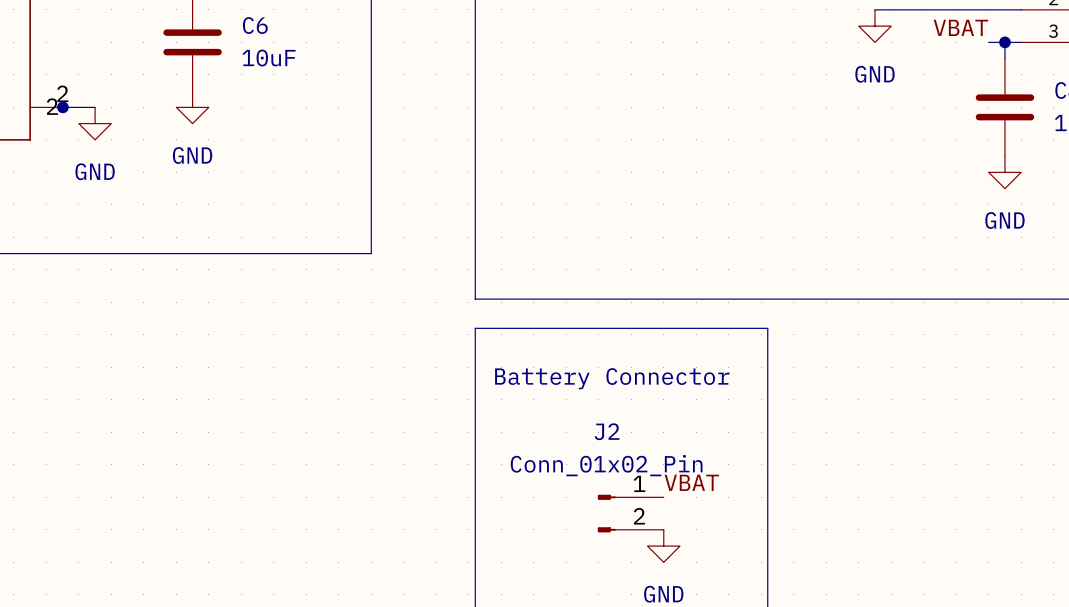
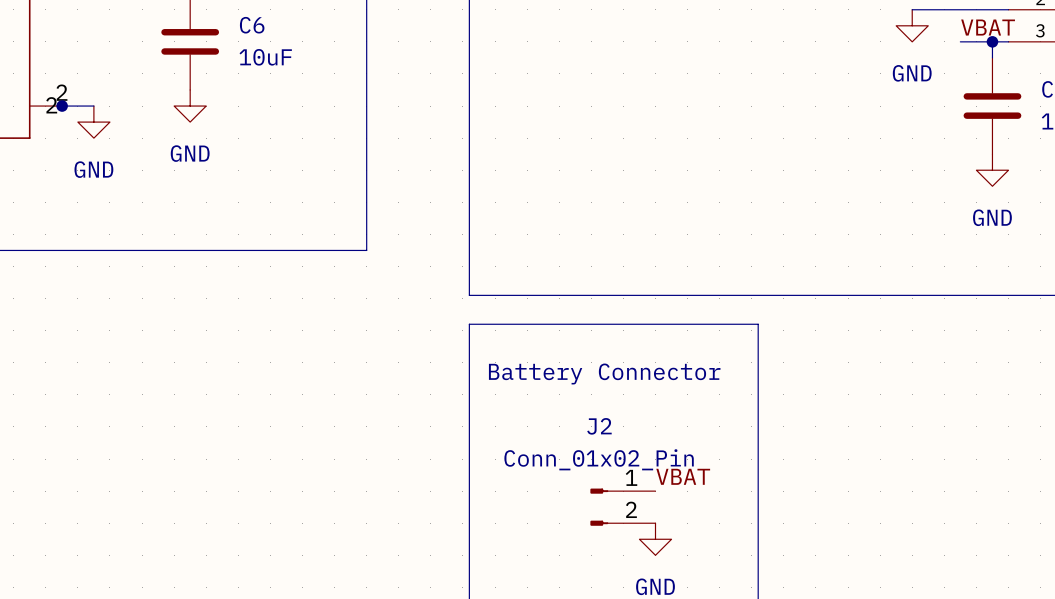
wire: (874, 9) (923, 9) -> none
power symbol position: GND (874, 26) -> GND (912, 25)
label position: VBAT (960, 27) -> VBAT (988, 27)
wire: none -> (960, 41) (976, 41)

